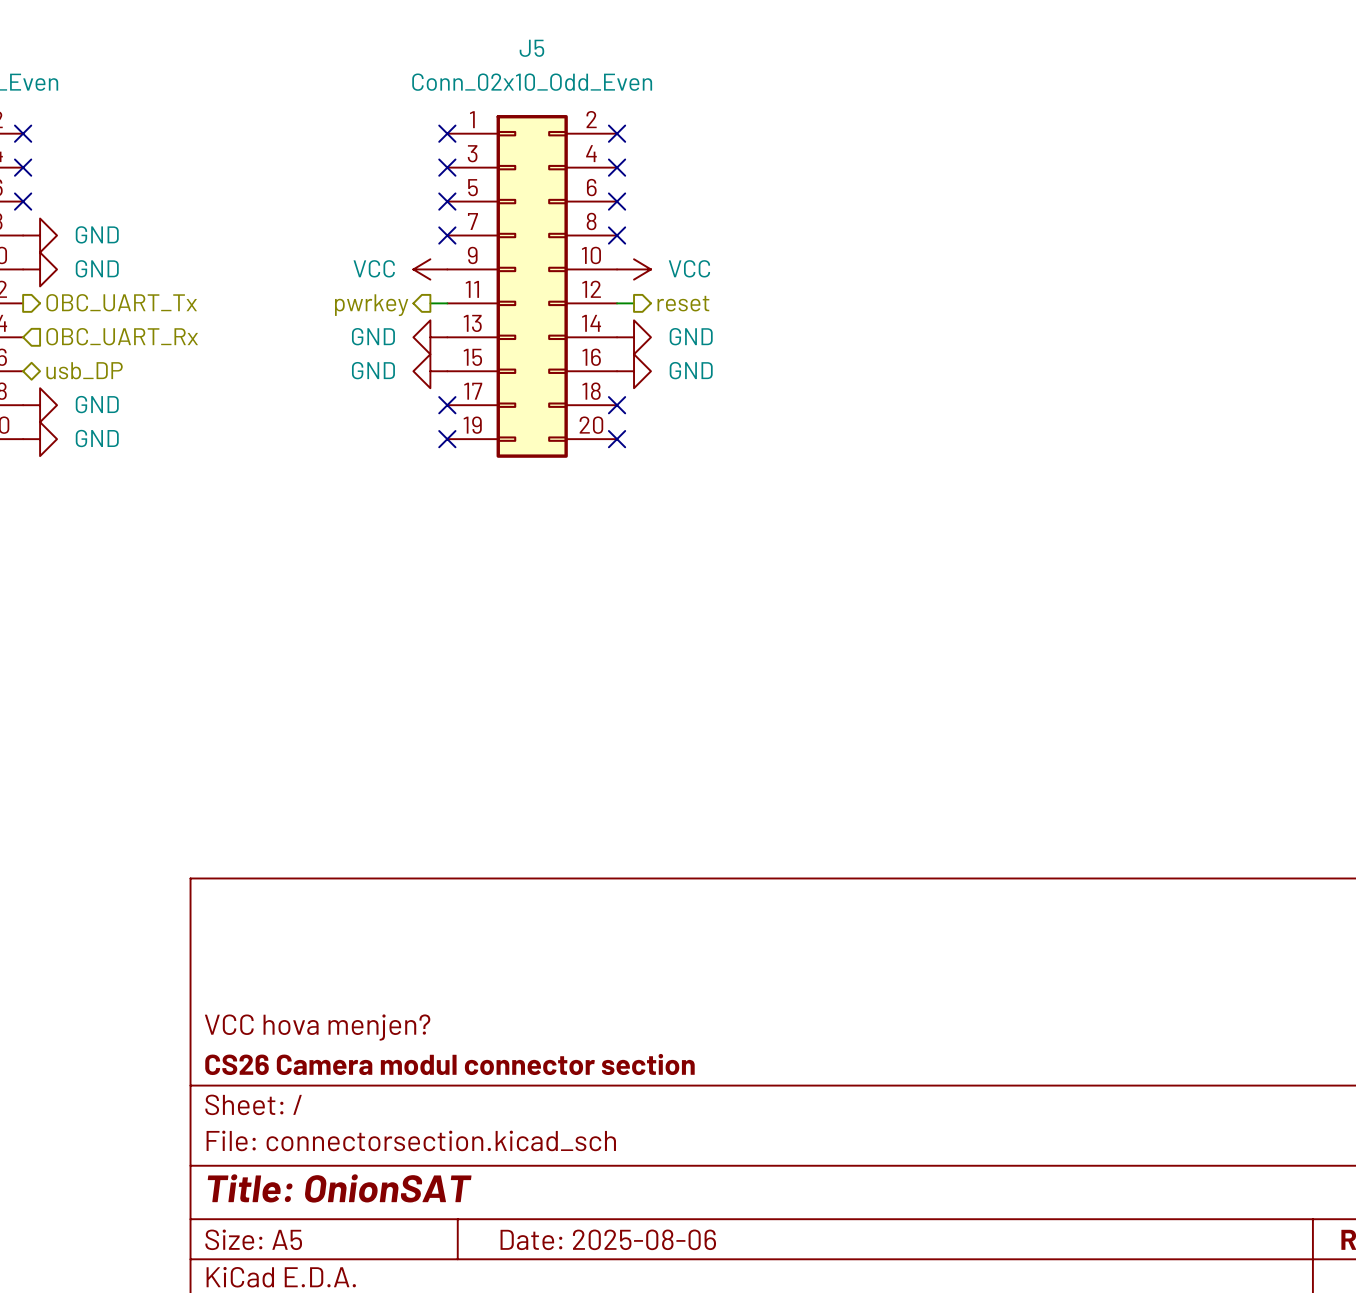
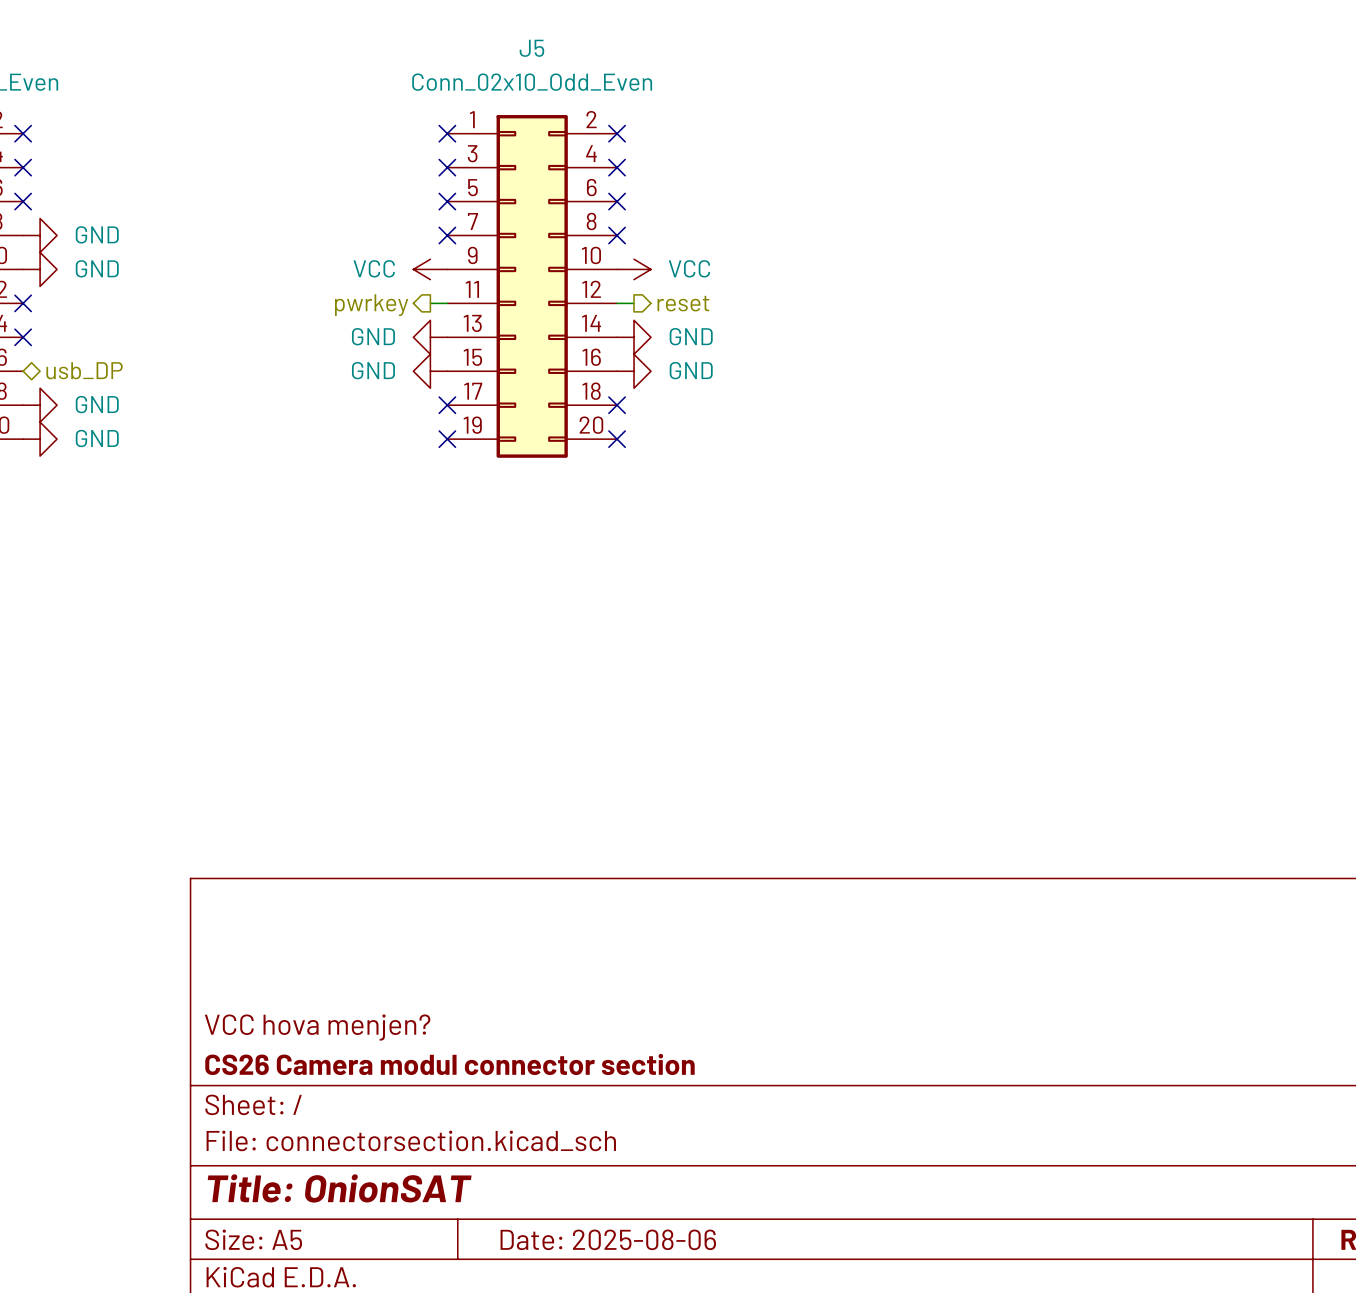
hierarchical label: OBC_UART_Tx (121, 302) -> none
no-connect mark: none -> (23, 303)
hierarchical label: OBC_UART_Rx (122, 336) -> none
no-connect mark: none -> (23, 337)

